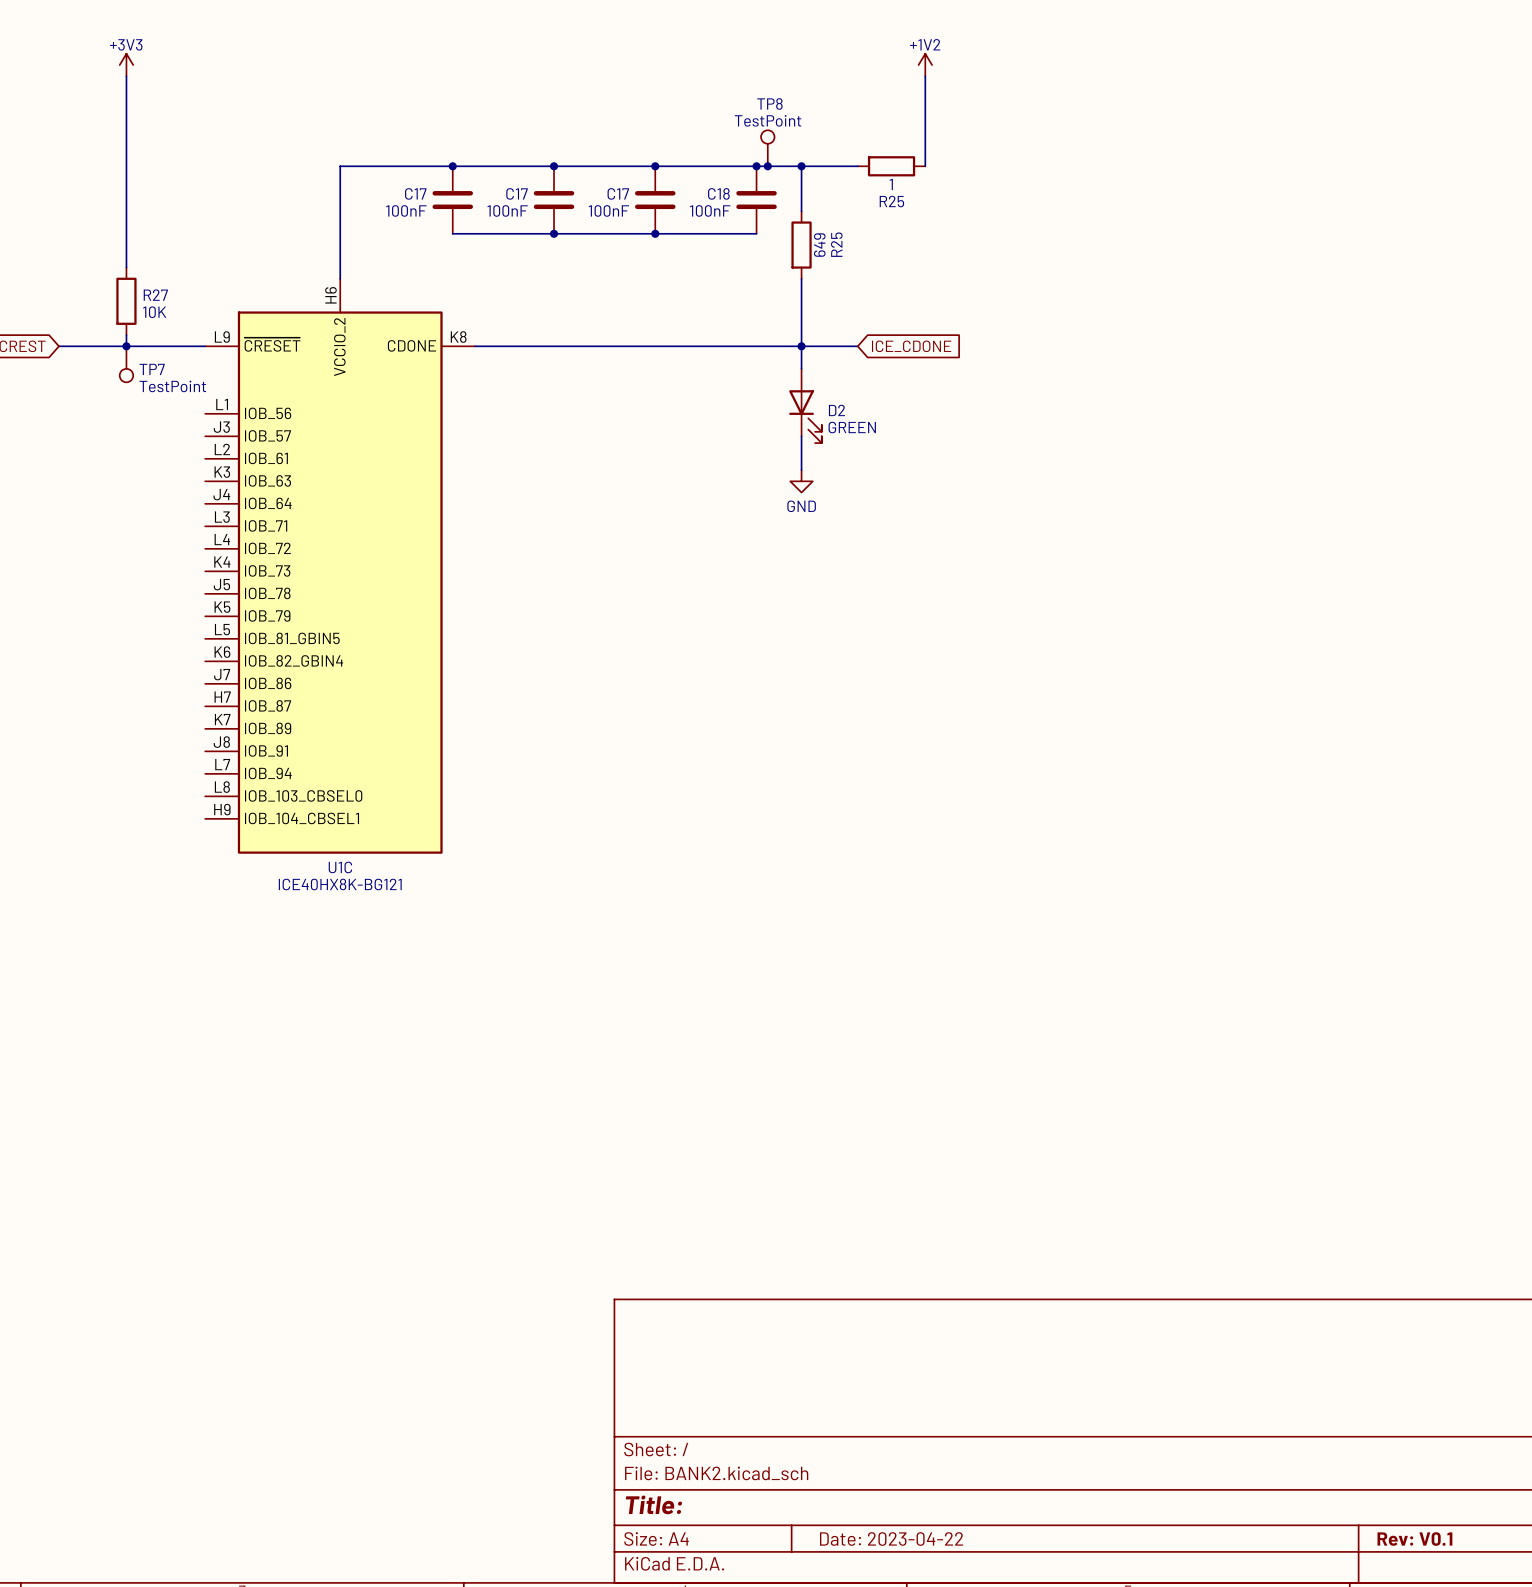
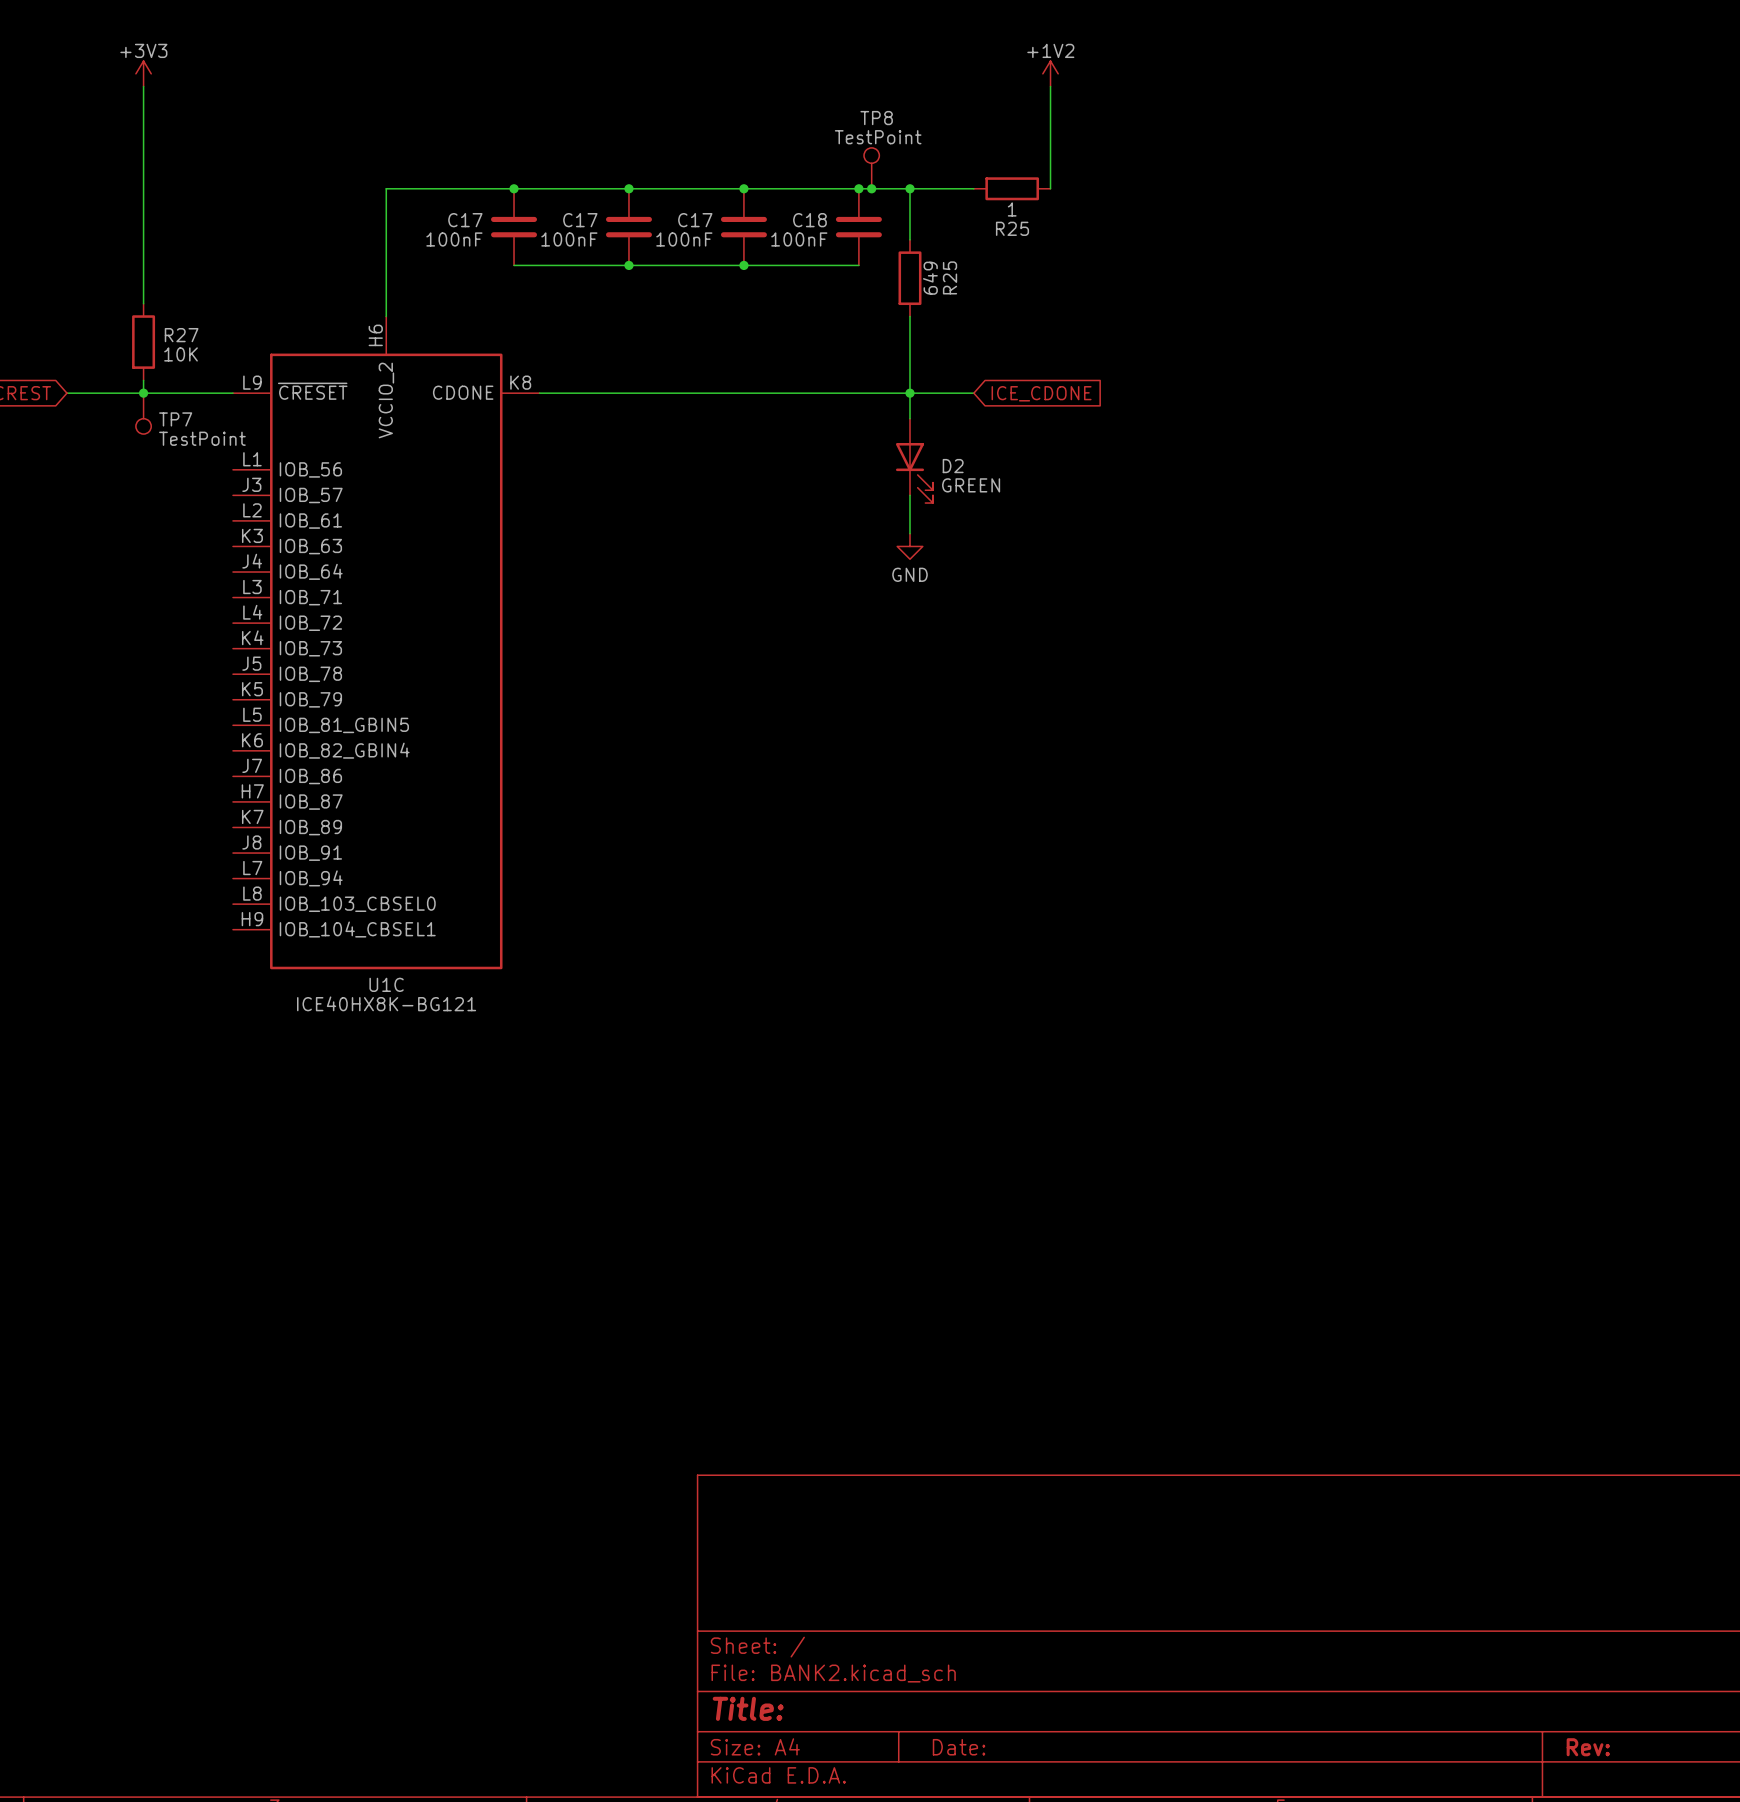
title block: Date: 2023-04-22 (891, 1539) -> Date: (959, 1747)
title block: Rev: V0.1 (1414, 1539) -> Rev: (1588, 1747)

